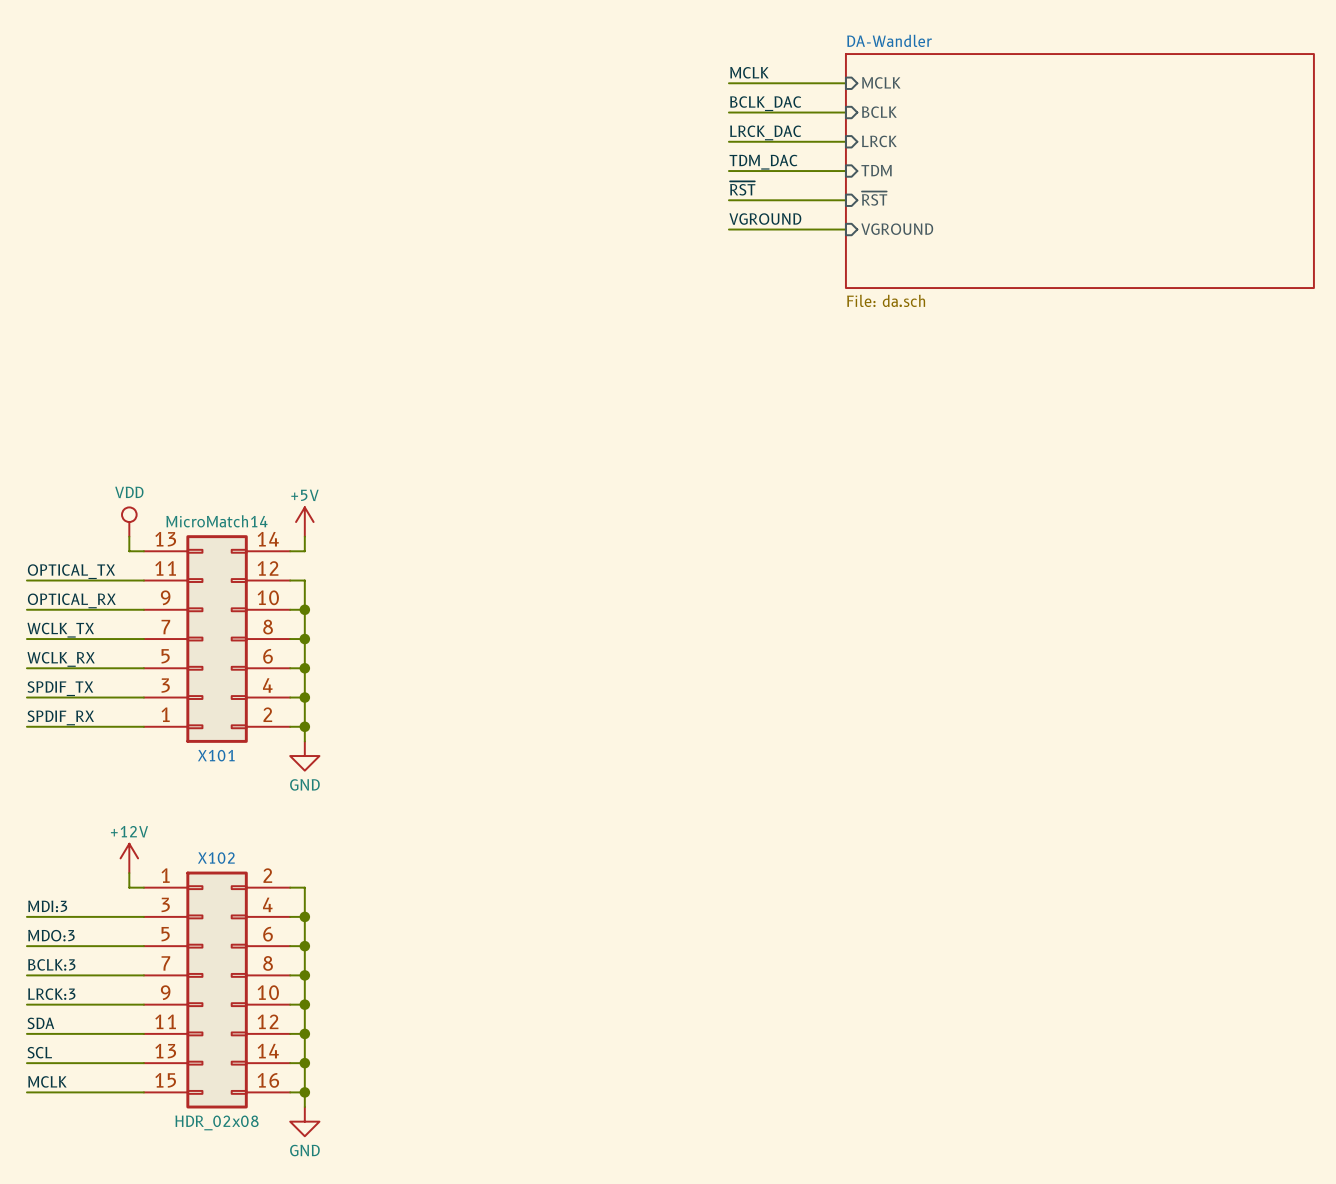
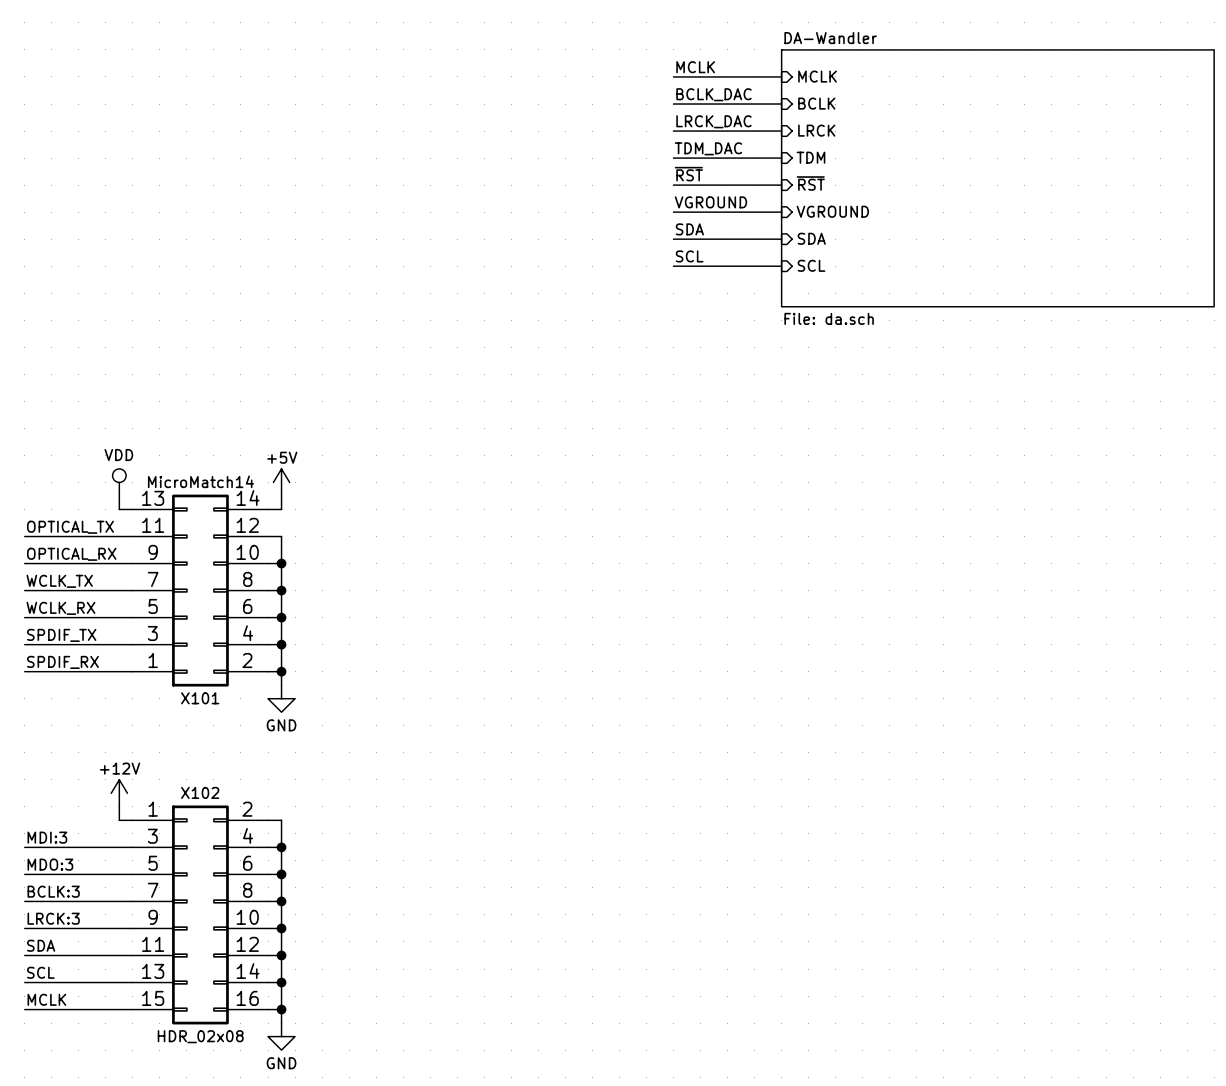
sheet DA-Wandler: File: da.sch (1079, 171) -> none
sheet DA-Wandler: none -> File: da.sch (997, 178)
label: none -> SDA (689, 229)
wire: none -> (673, 239) (781, 239)
sheet pin: none -> SDA (811, 238)
label: none -> SCL (689, 256)
sheet pin: none -> SCL (811, 265)
wire: none -> (673, 266) (781, 266)

